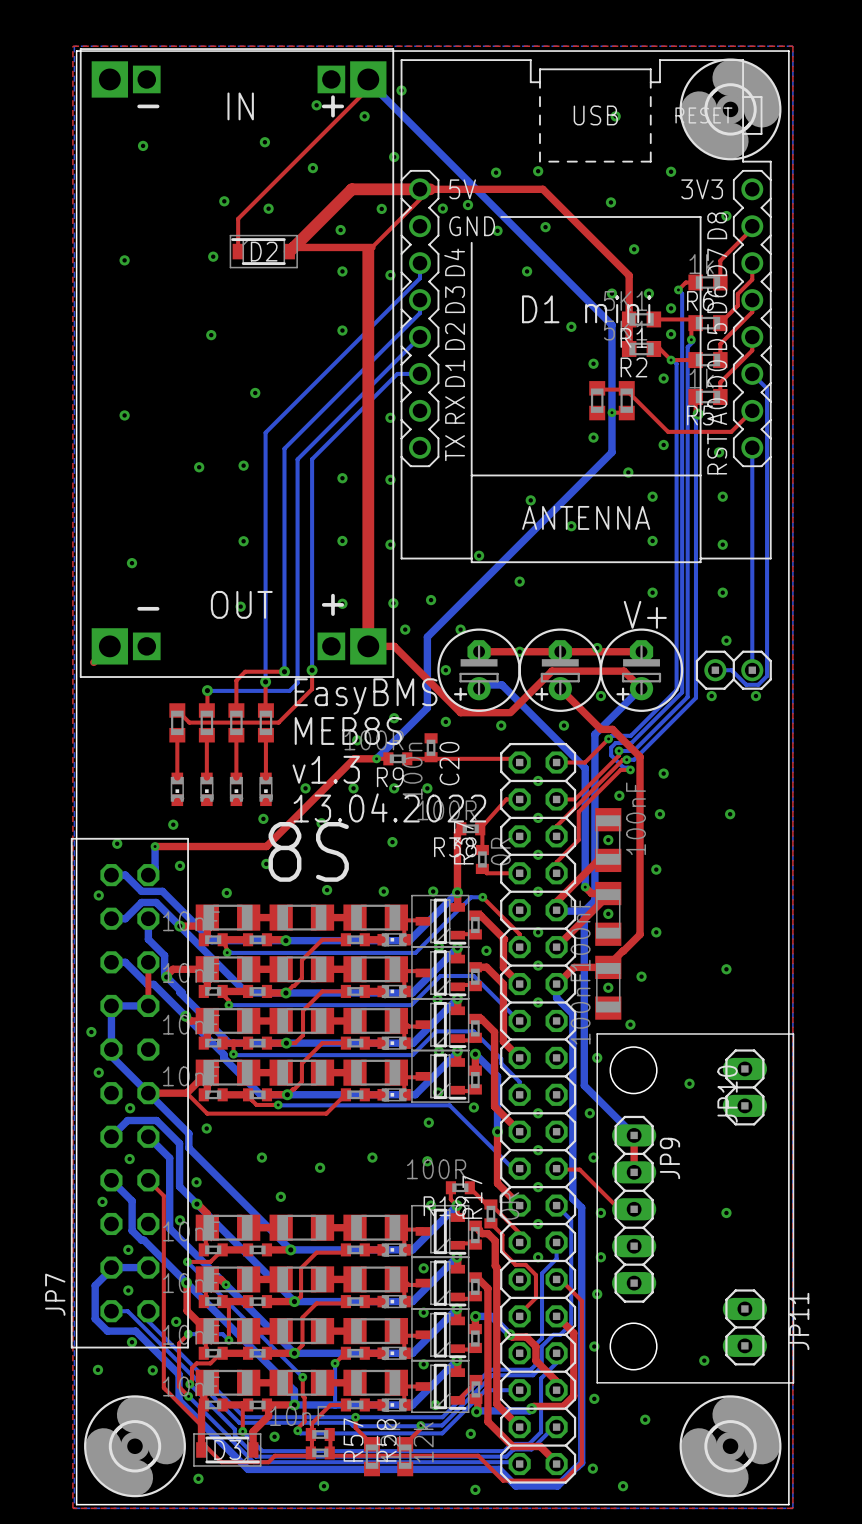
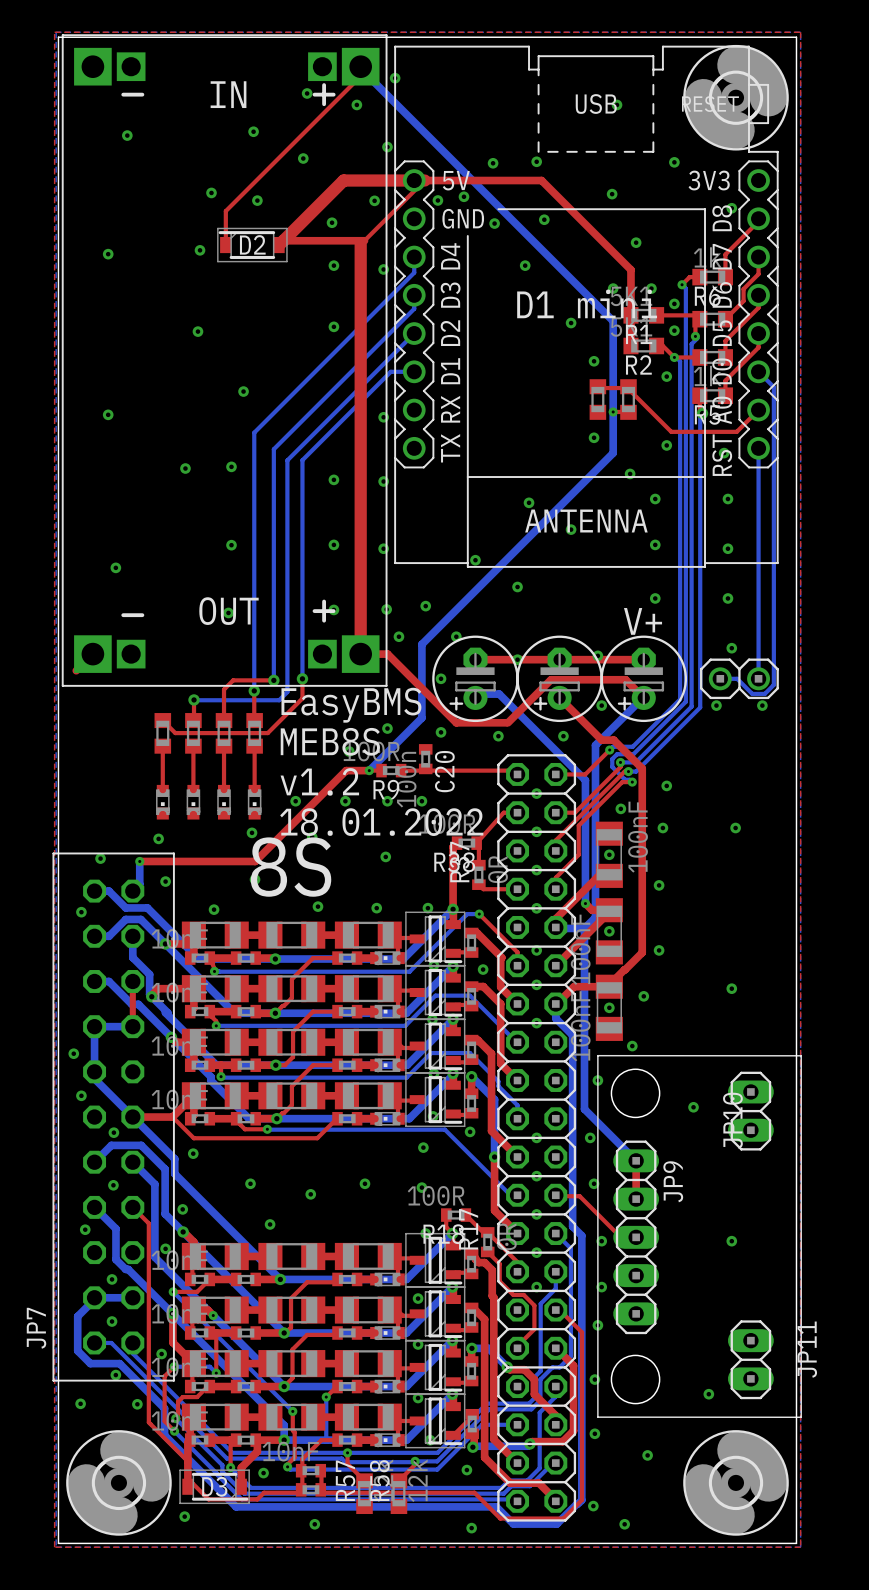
text: v1.3 (326, 769) -> v1.2 (319, 781)
text: 13.04.2022 (389, 807) -> 18.01.2022 (381, 822)

